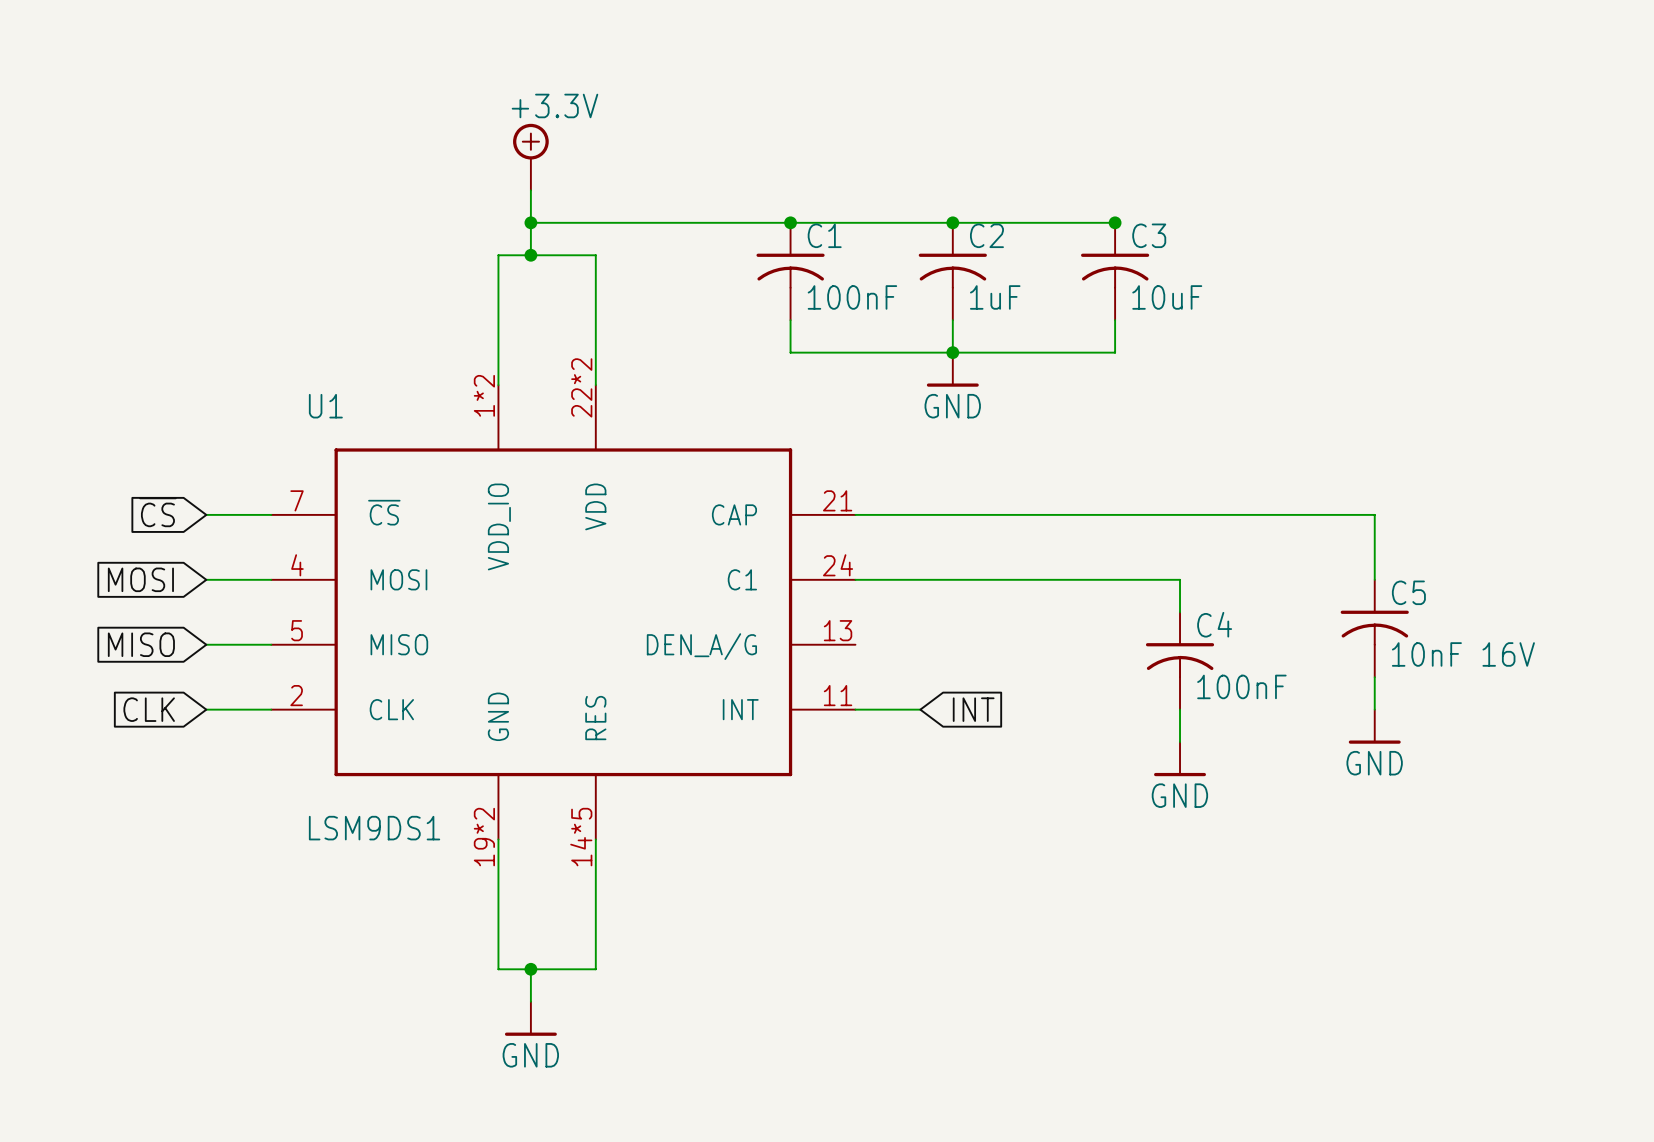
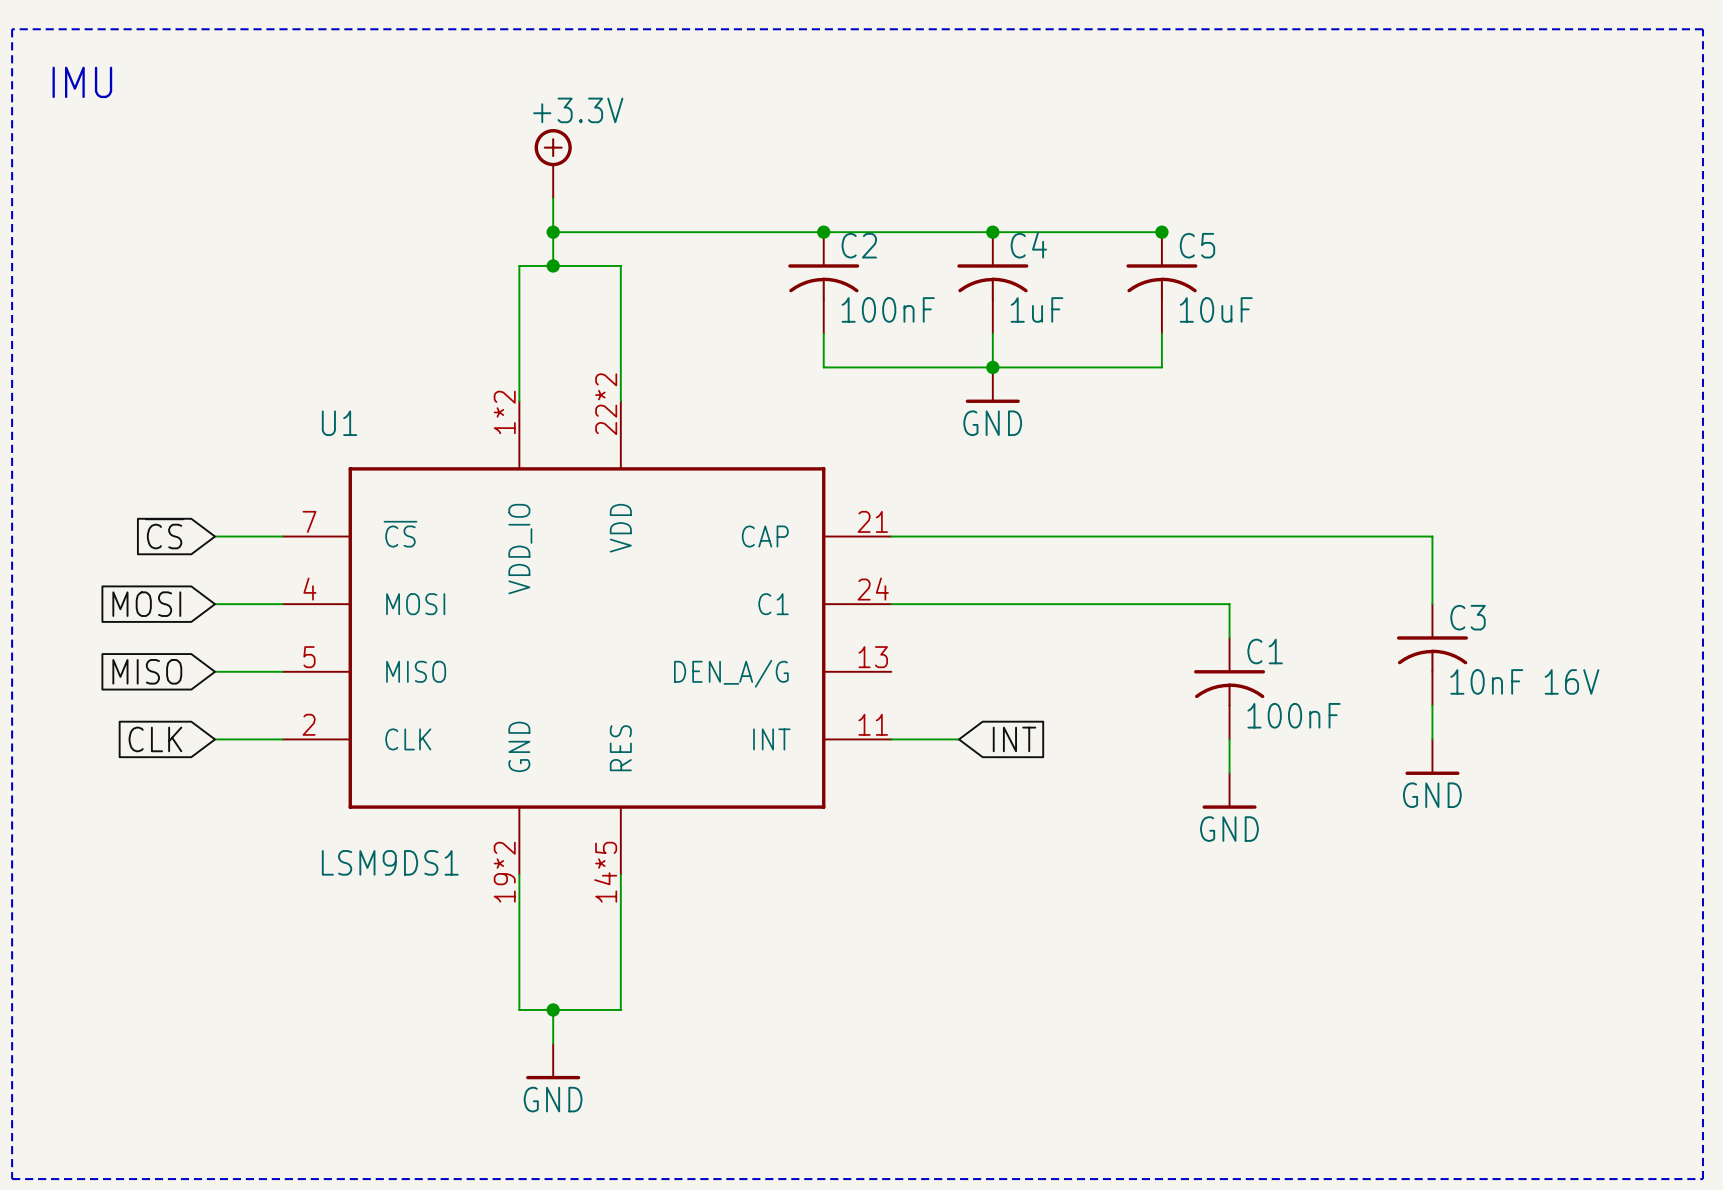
line: none -> (12, 29) (12, 1179) (1702, 1179) (1702, 29) (12, 29)
text: none -> IMU (82, 82)
C1 name: C1 (824, 235) -> C2 (859, 245)
C2 name: C2 (986, 235) -> C4 (1028, 245)
C3 name: C3 (1149, 235) -> C5 (1197, 245)
C5 name: C5 (1408, 592) -> C3 (1468, 617)
C4 name: C4 (1214, 624) -> C1 (1265, 651)

